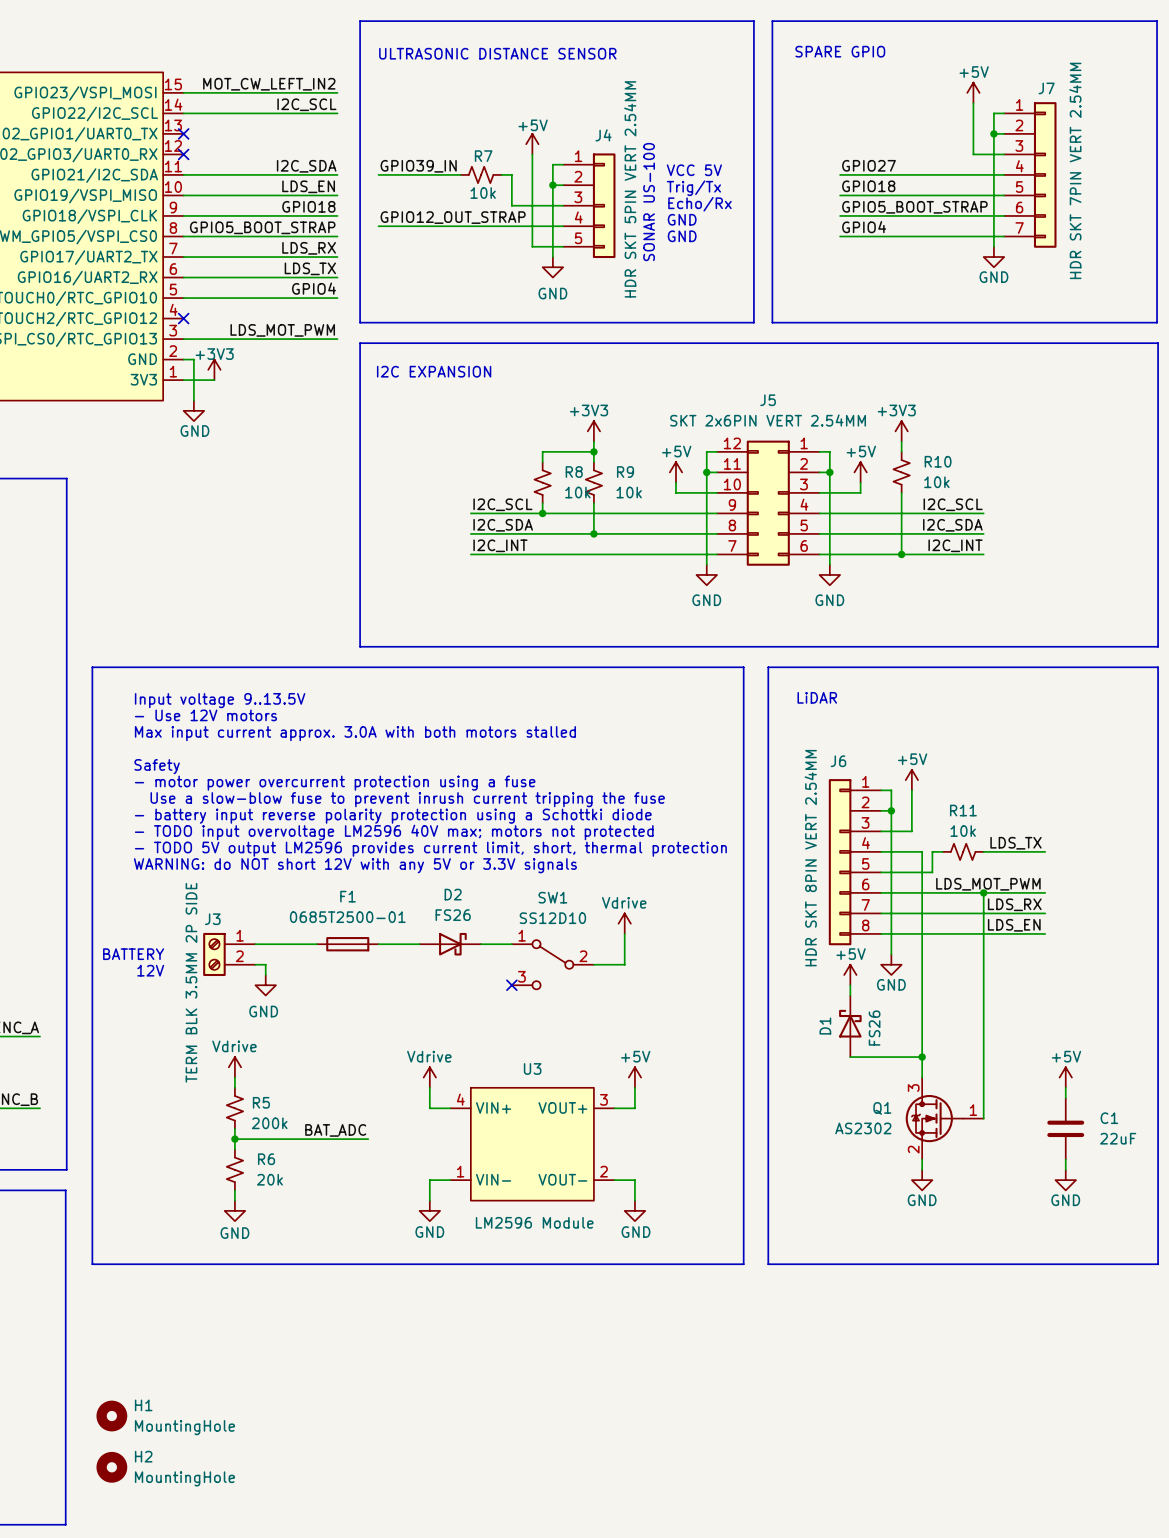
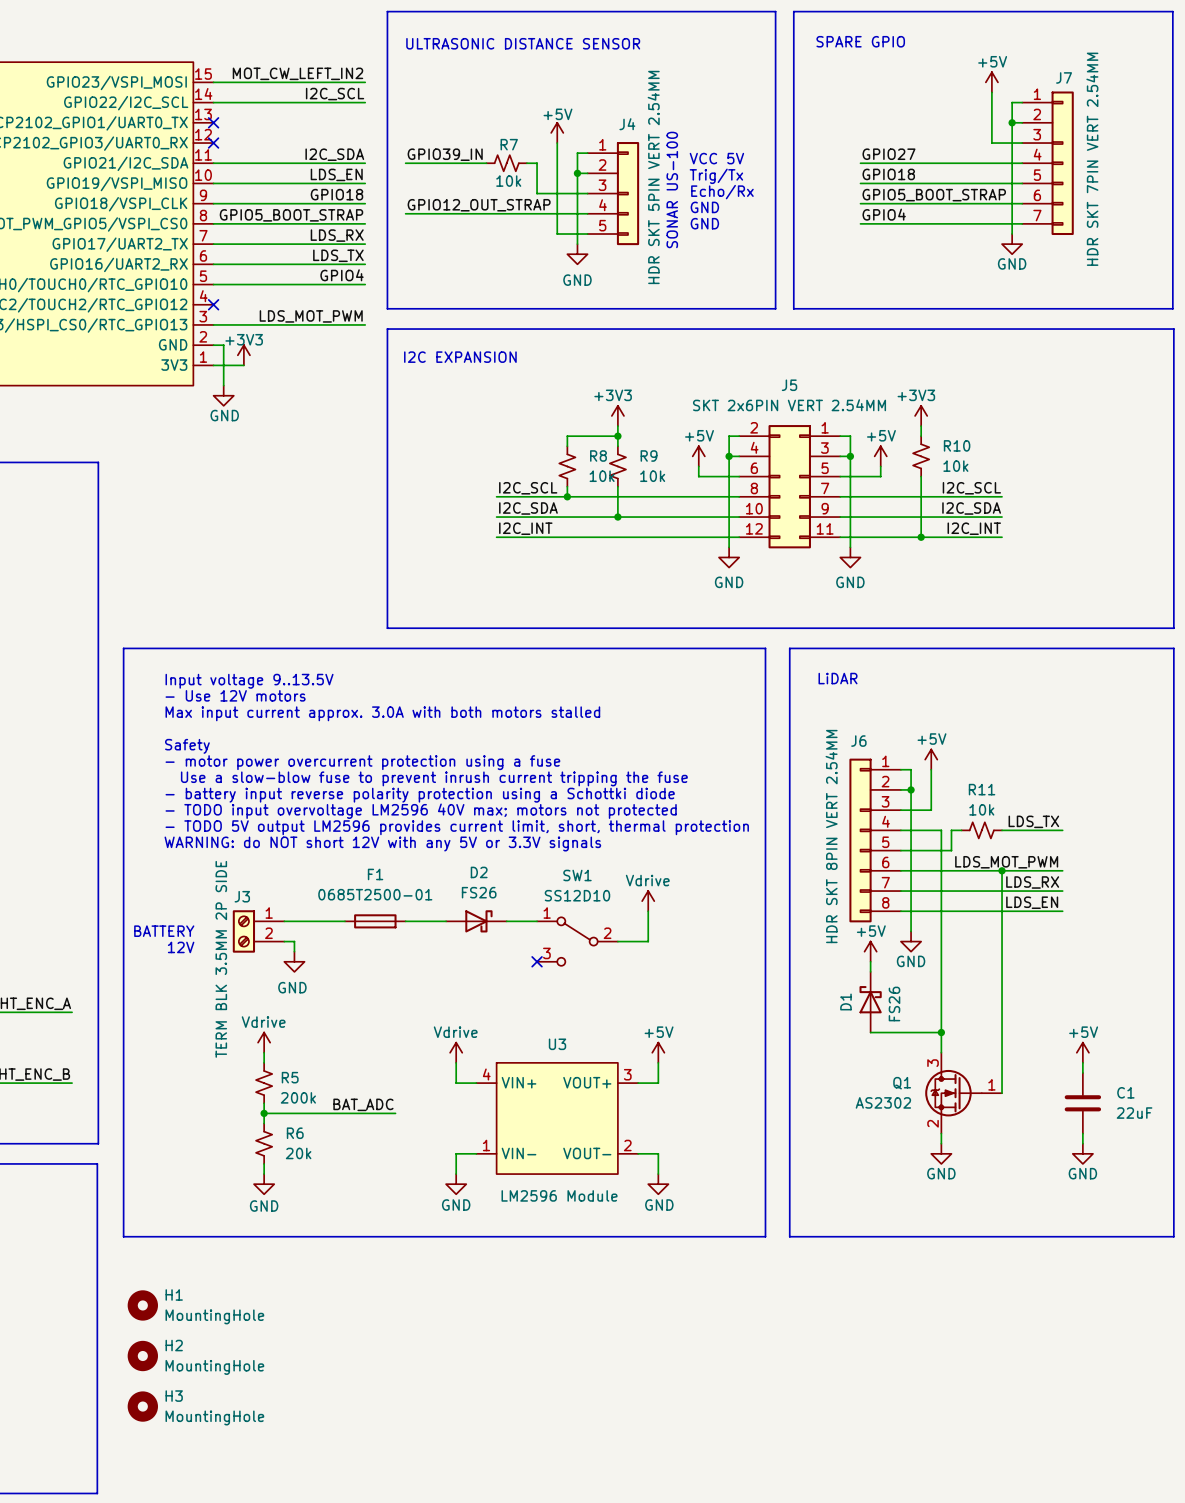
J5 symbol: [717, 440, 820, 566] -> [739, 425, 841, 549]
H1 position: (111, 1416) -> (142, 1305)
H3: none -> MountingHole (142, 1406)
H2 position: (111, 1467) -> (142, 1356)

